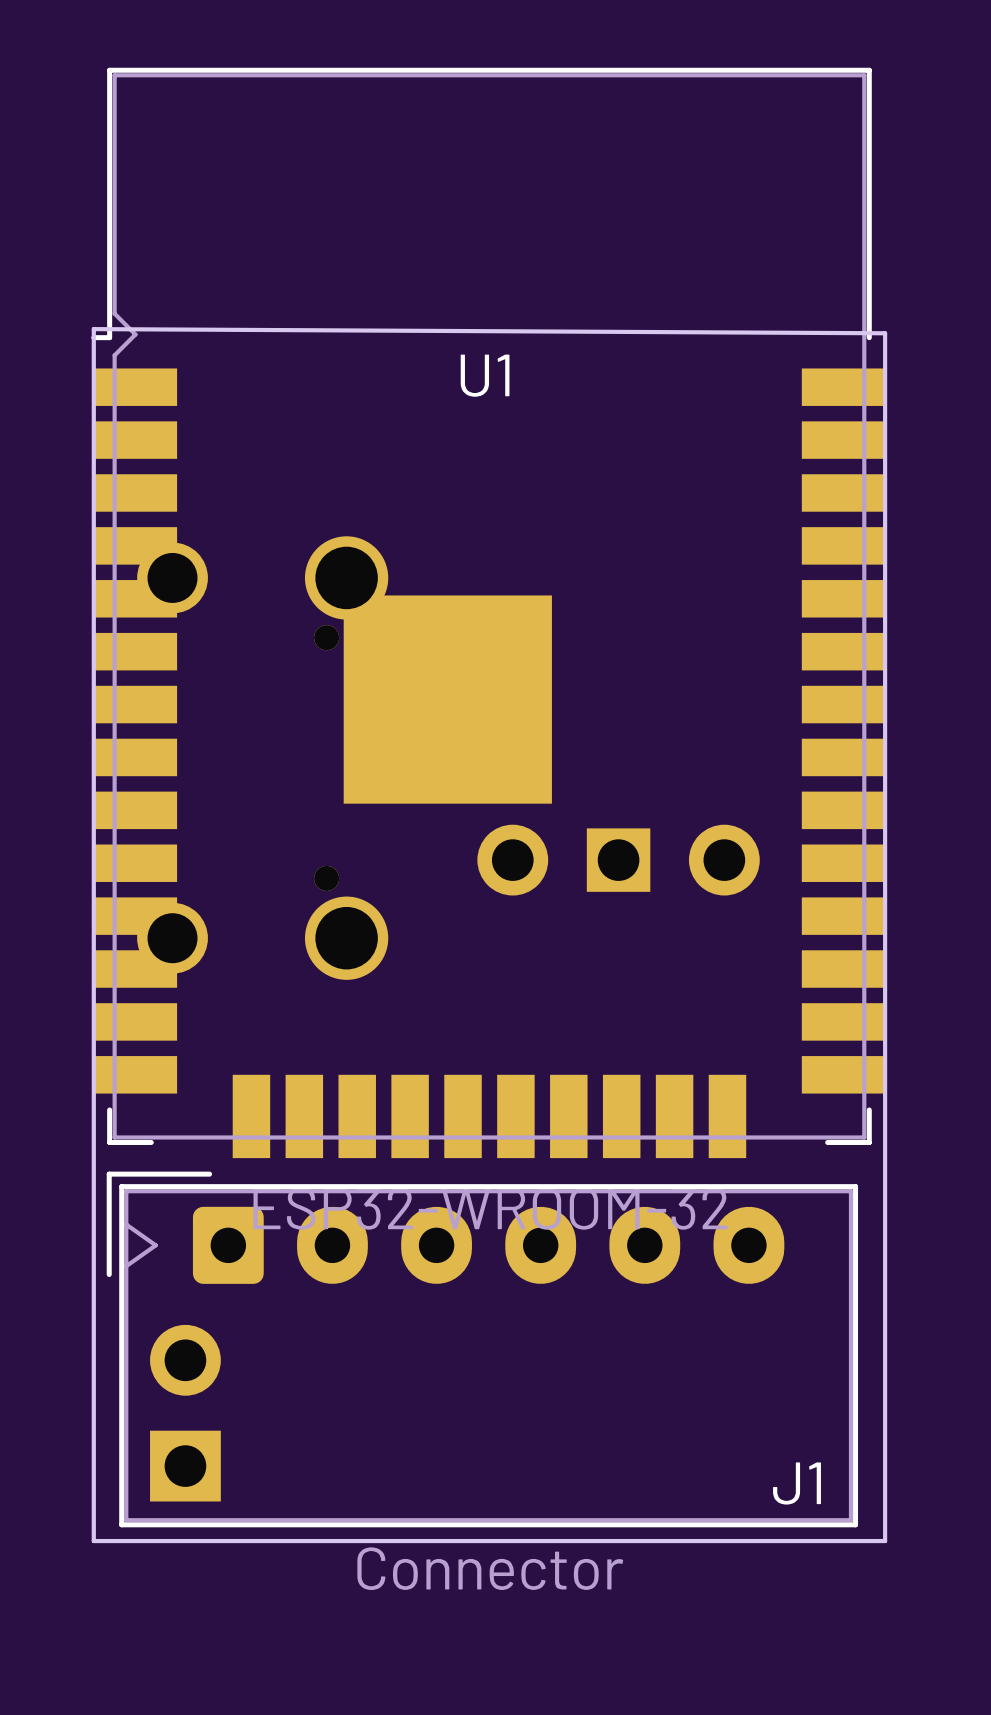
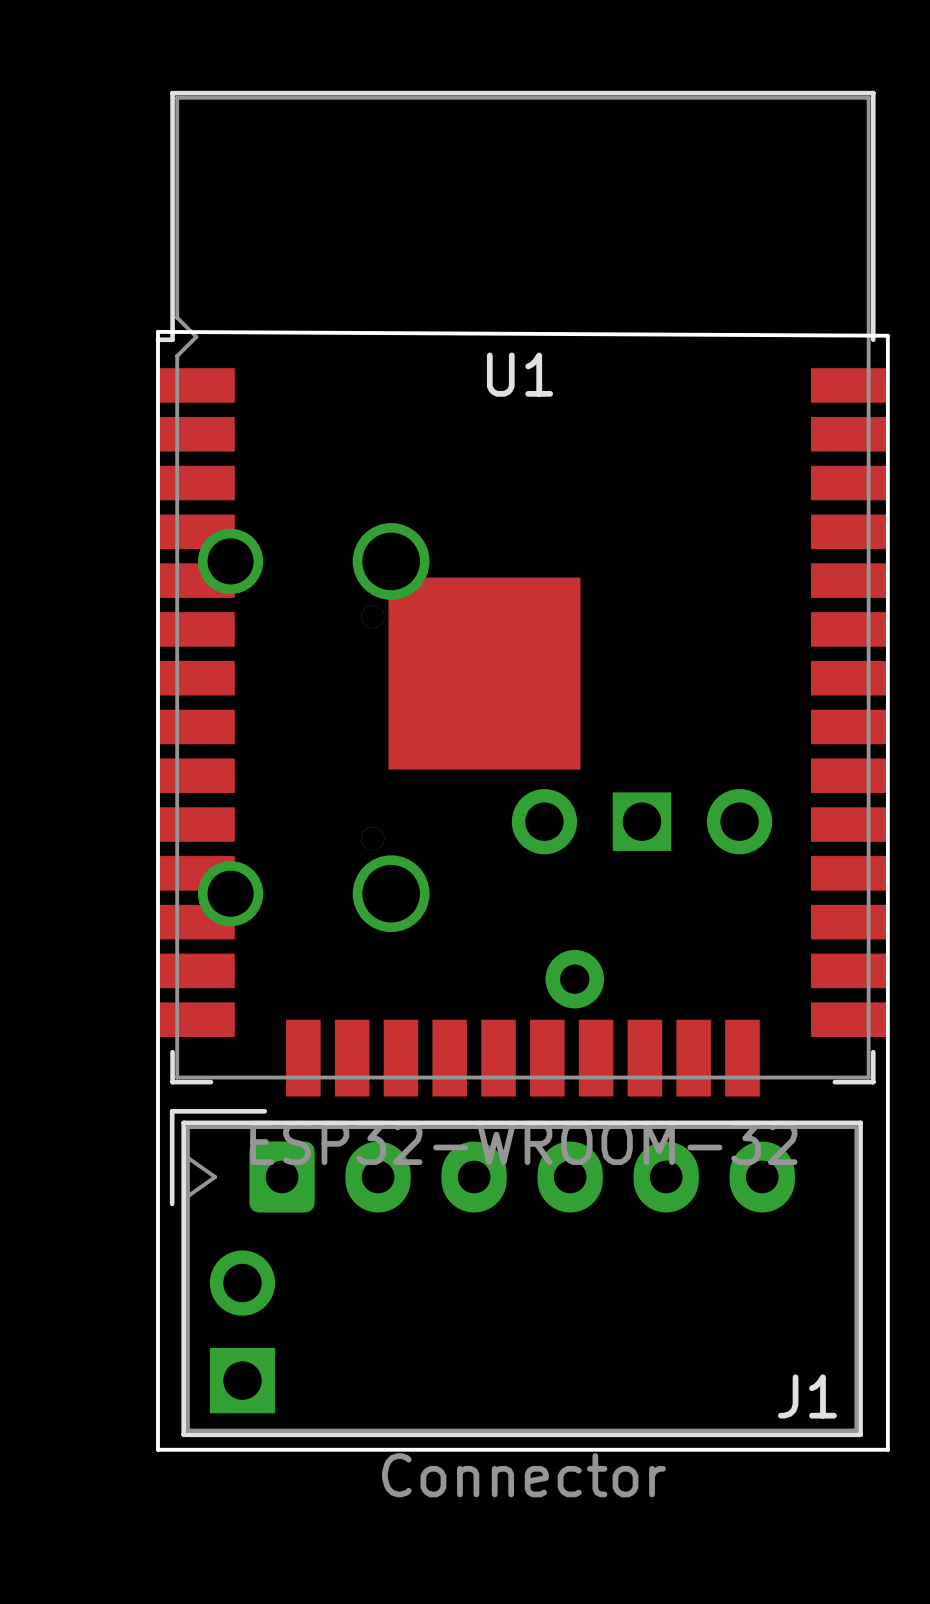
part: none -> (574, 979)

